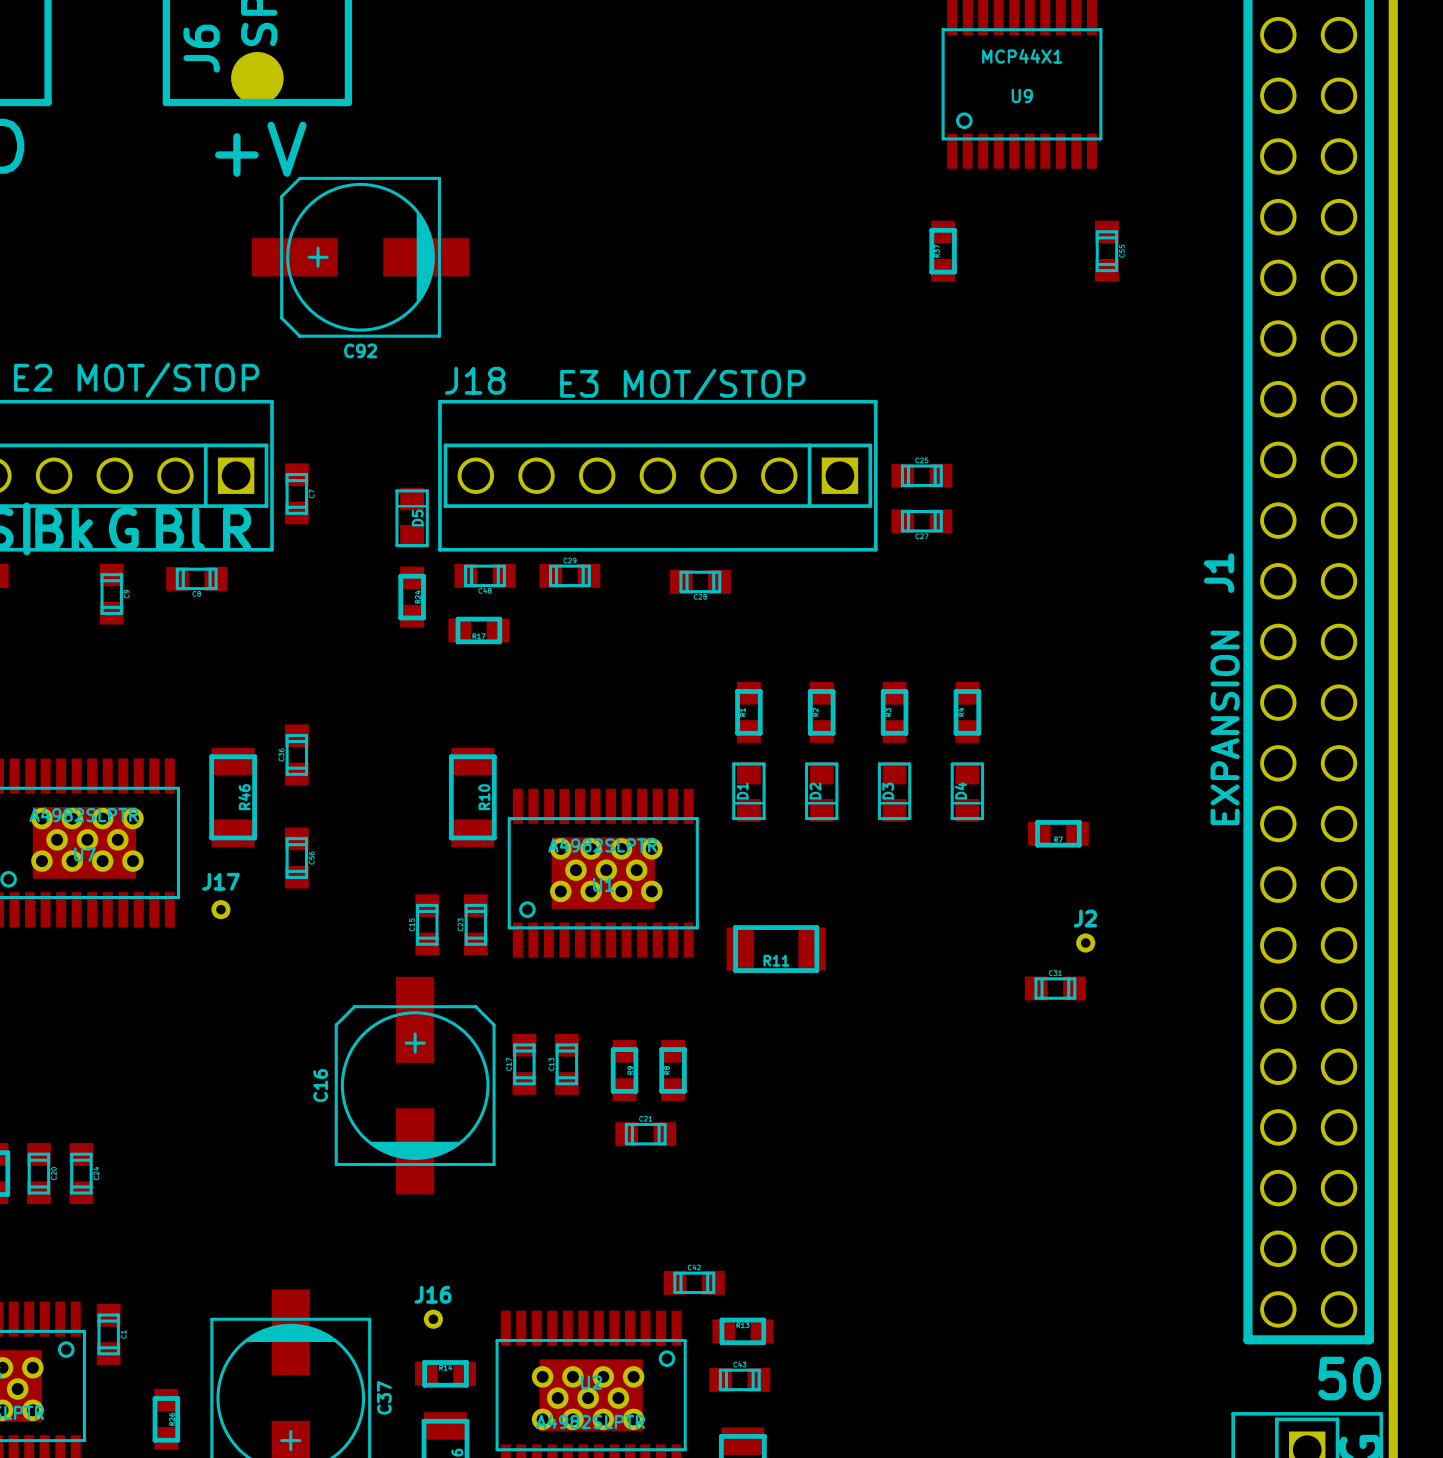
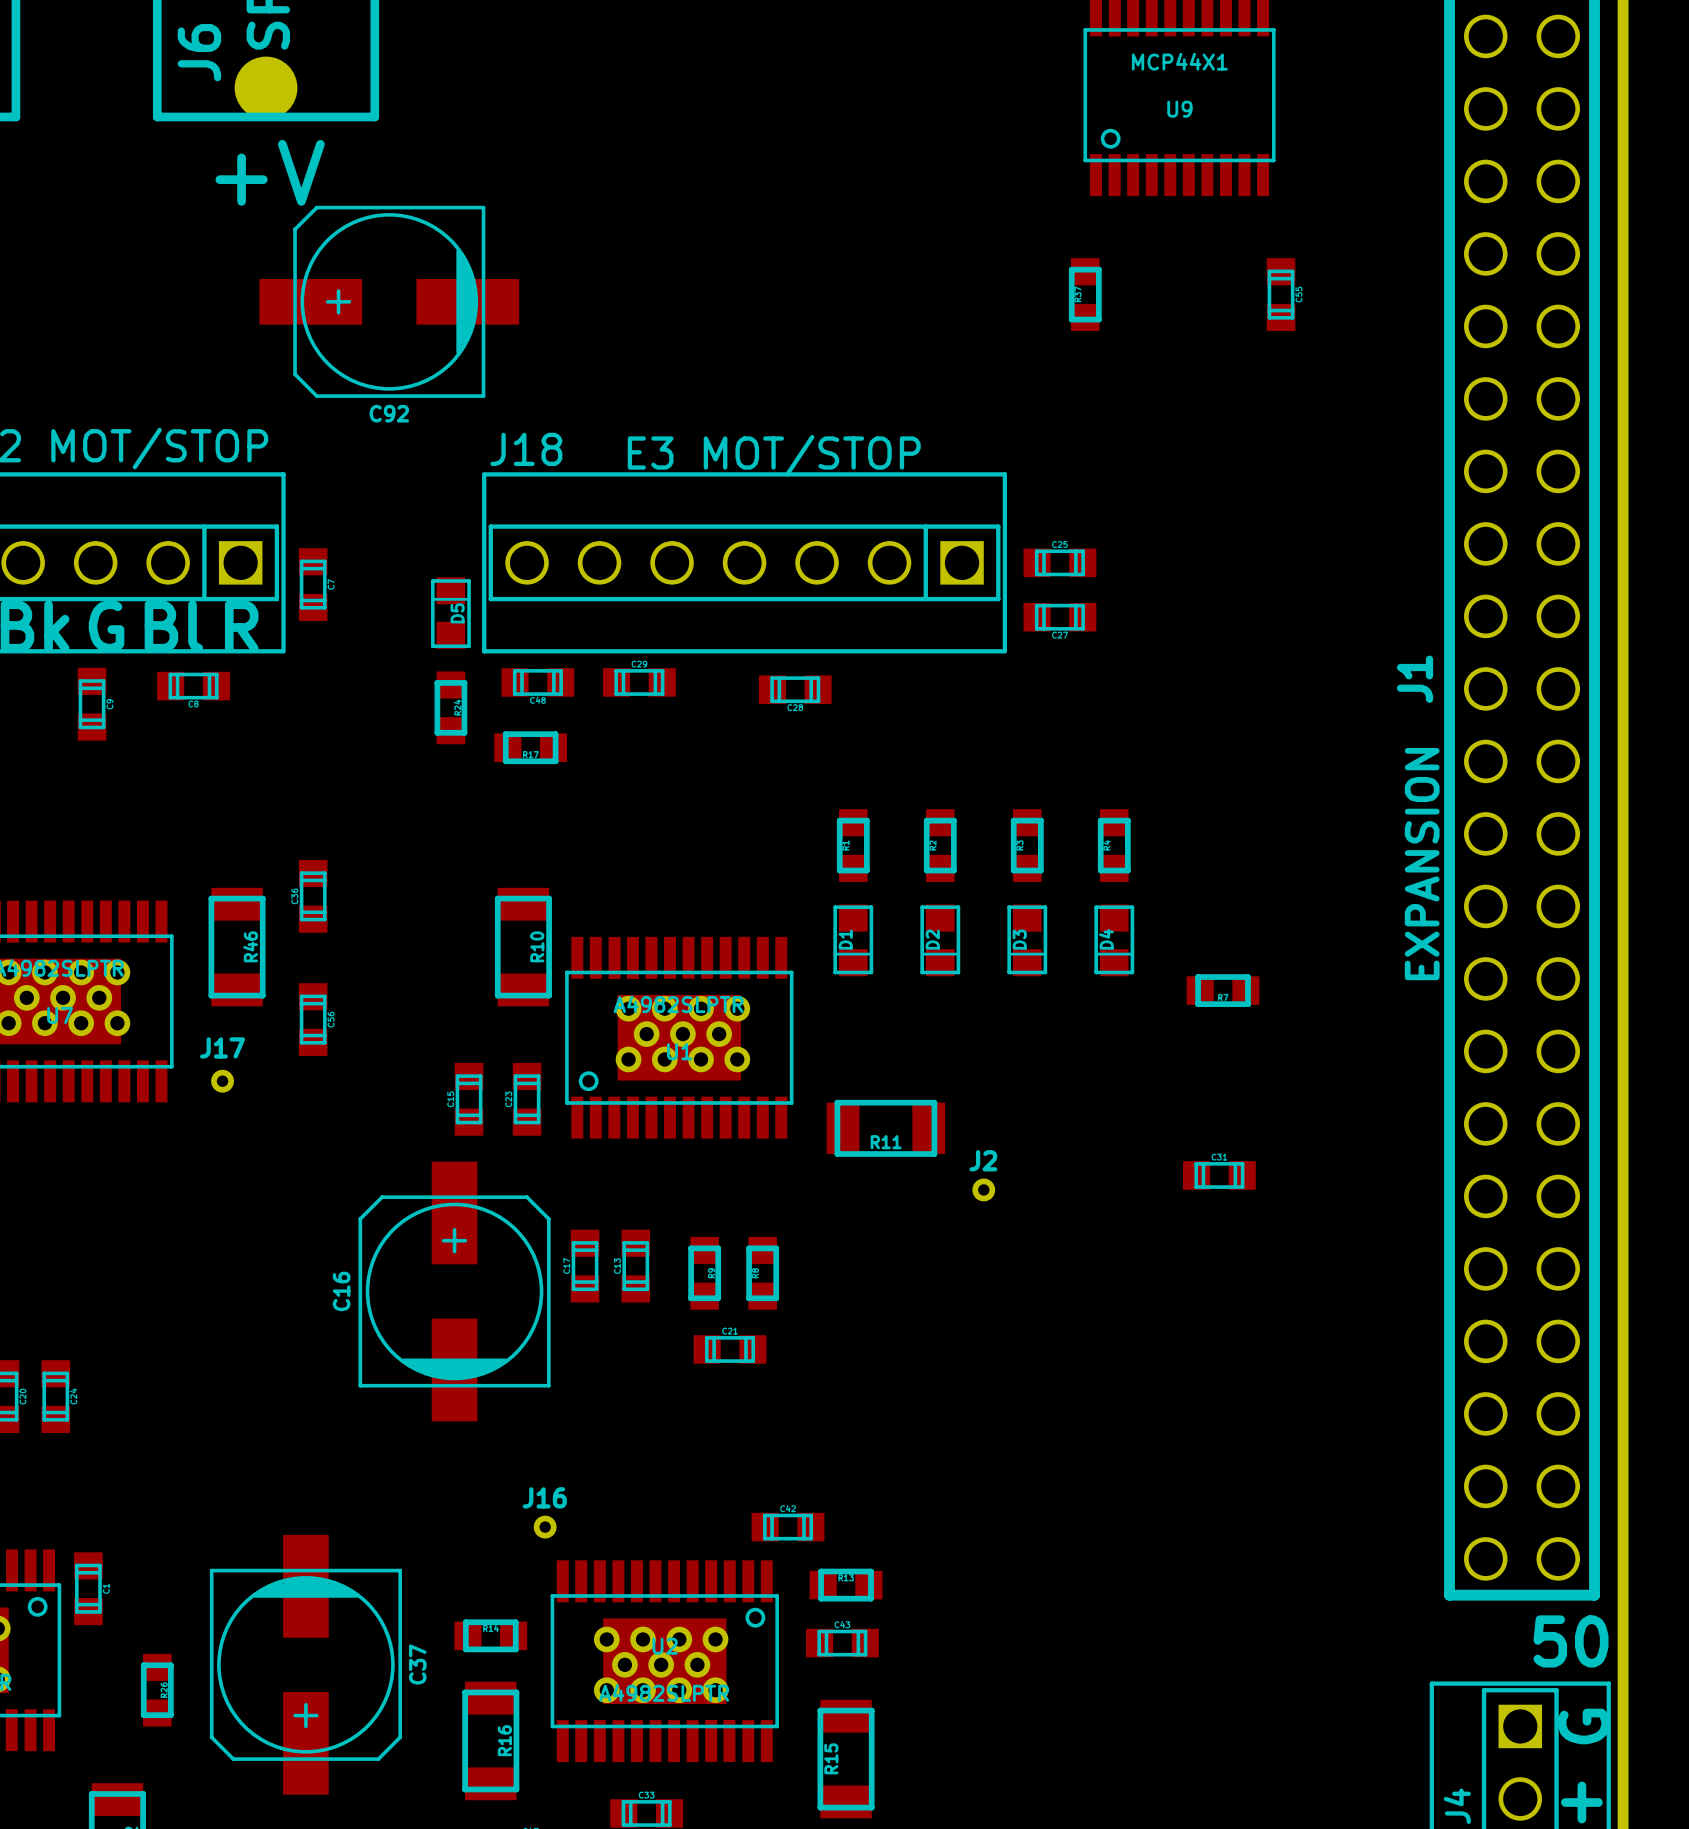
J2 position: (1085, 942) -> (983, 1189)
J16 position: (433, 1319) -> (545, 1527)

